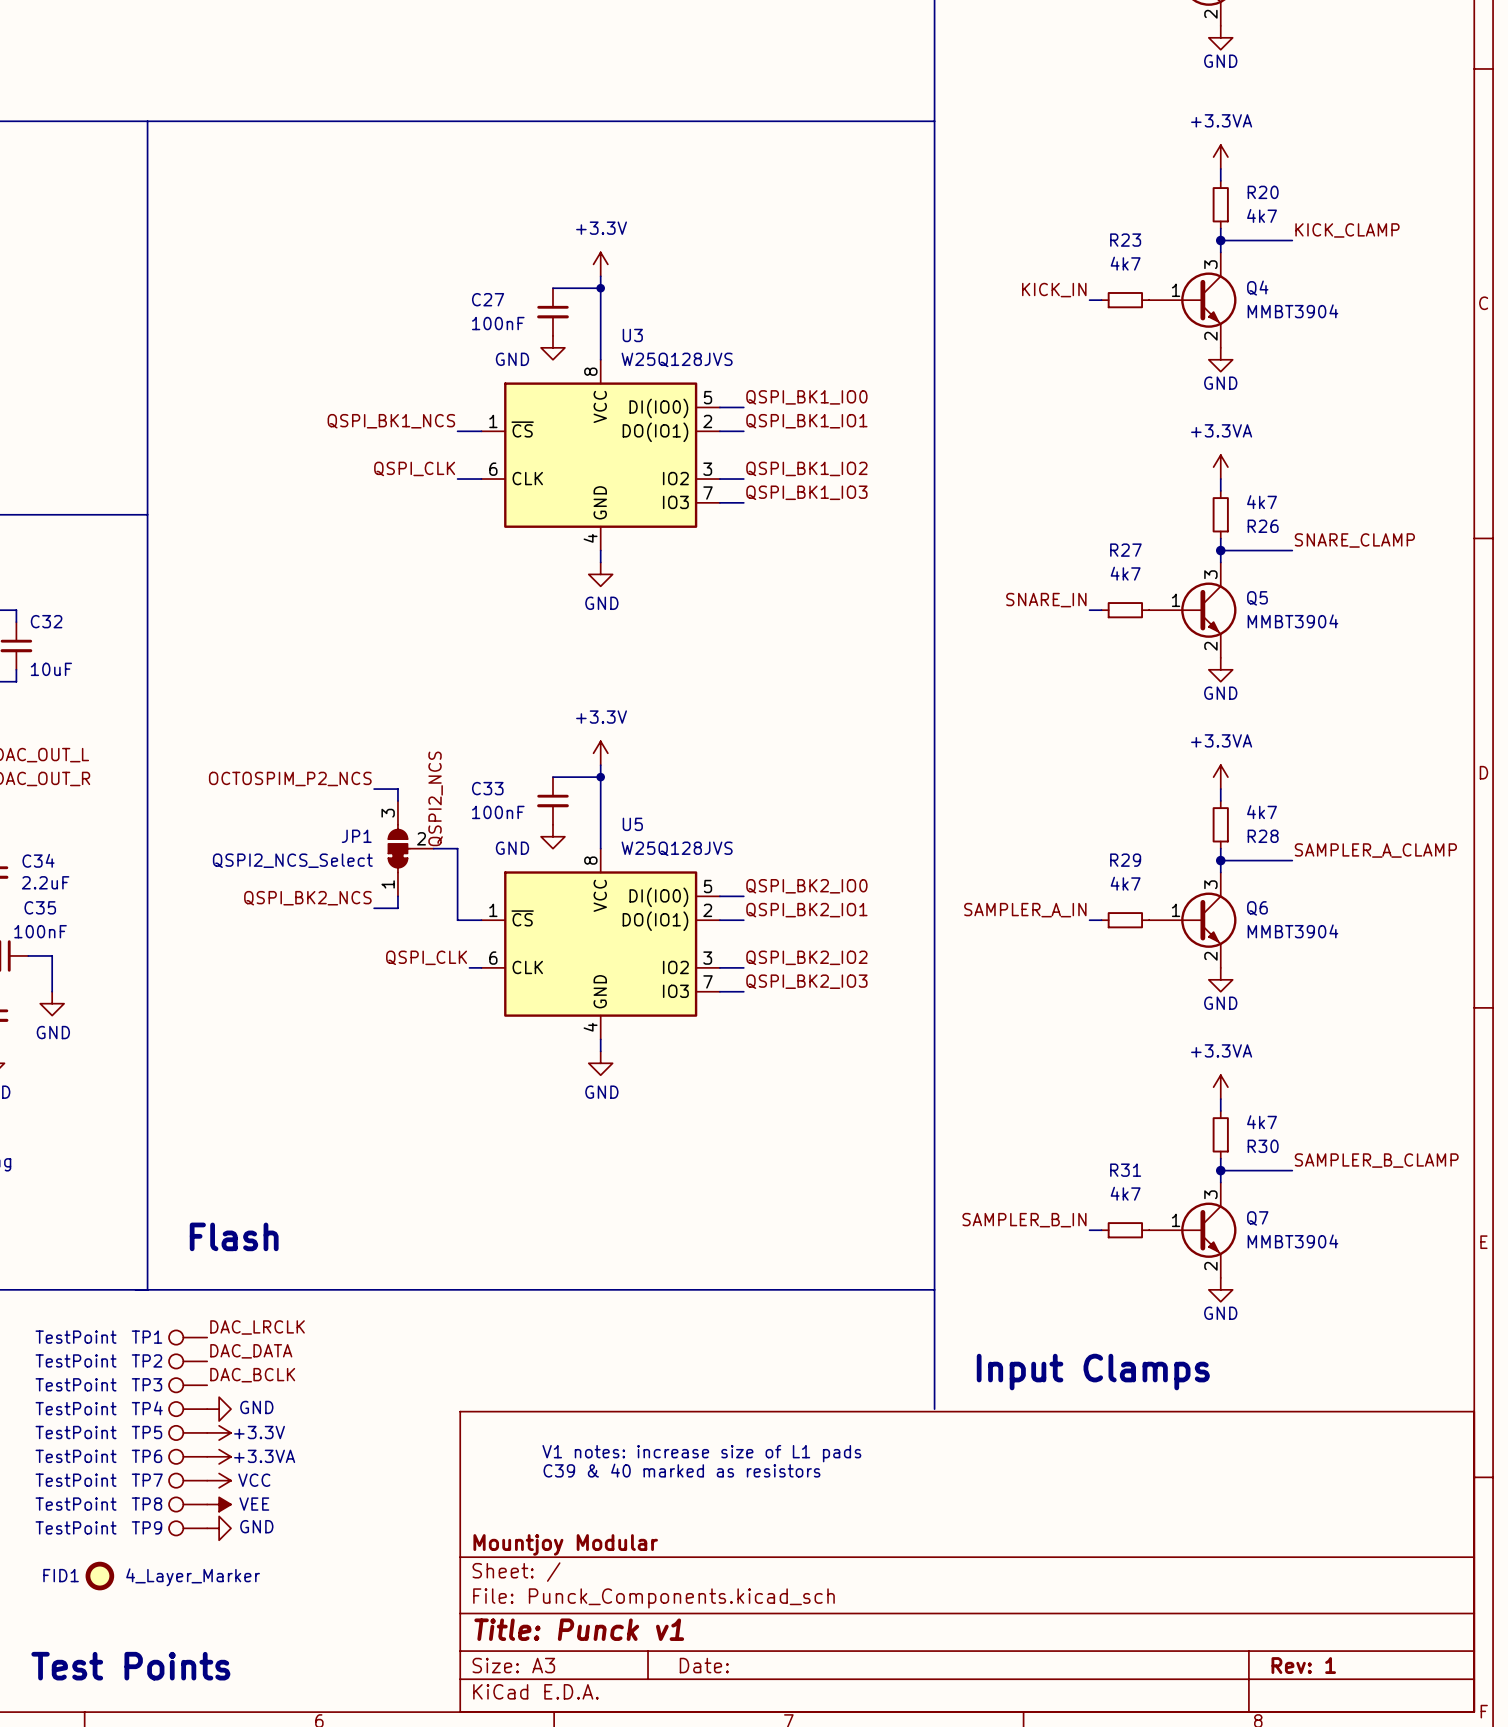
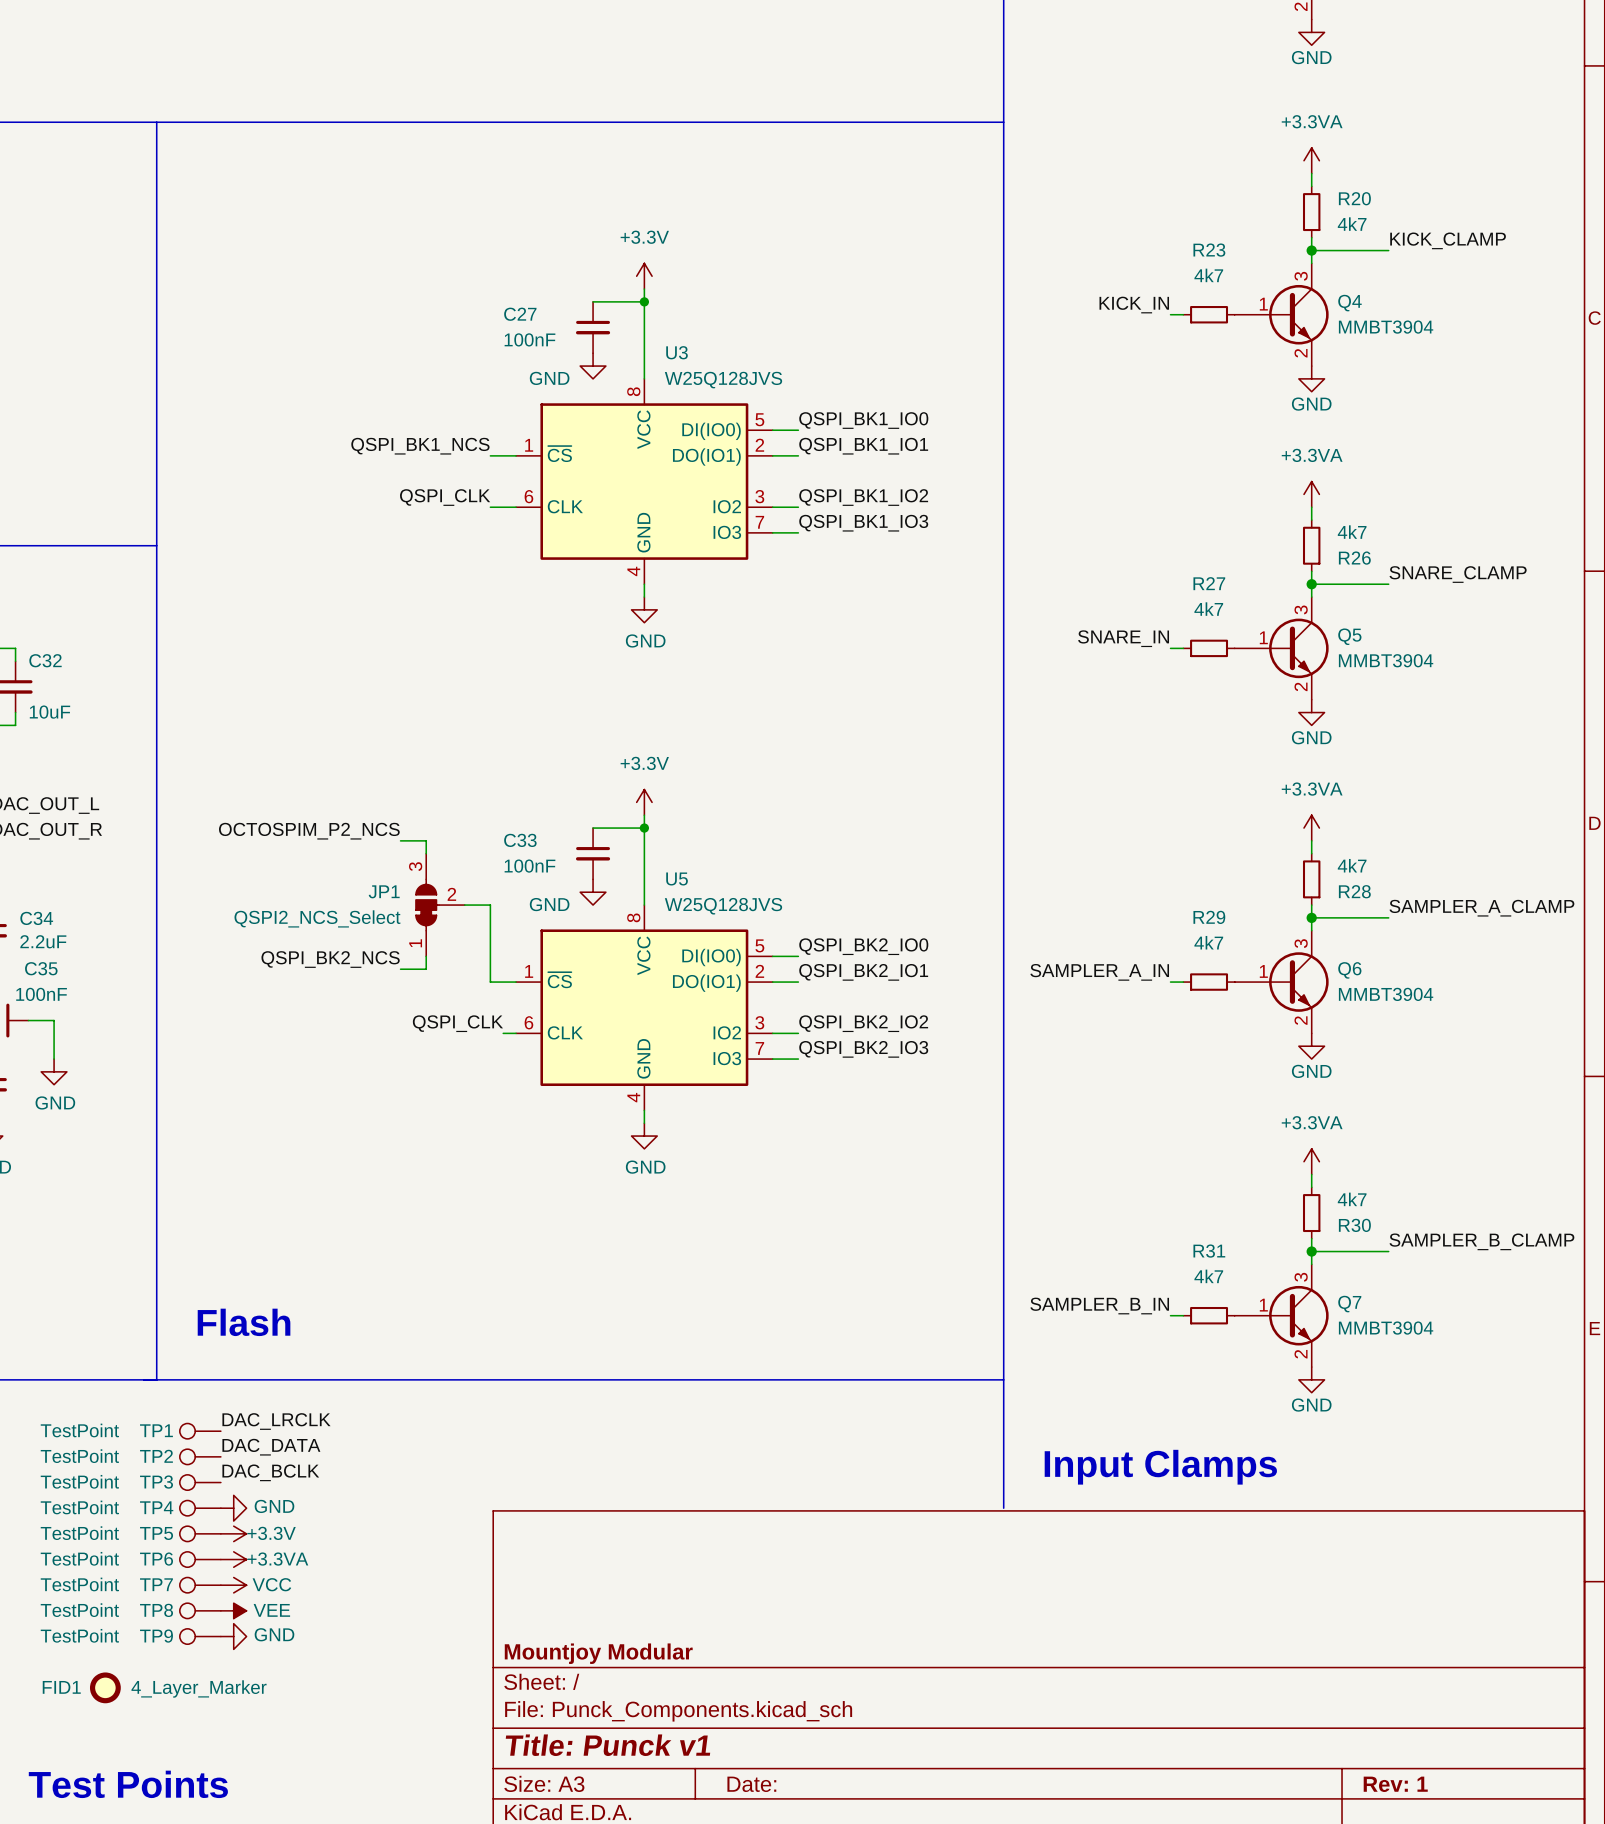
label: QSPI2_NCS (435, 798) -> none
text: V1 notes: increase size of L1 pads (701, 1453) -> none
text: C39 & 40 marked as resistors (681, 1470) -> none

